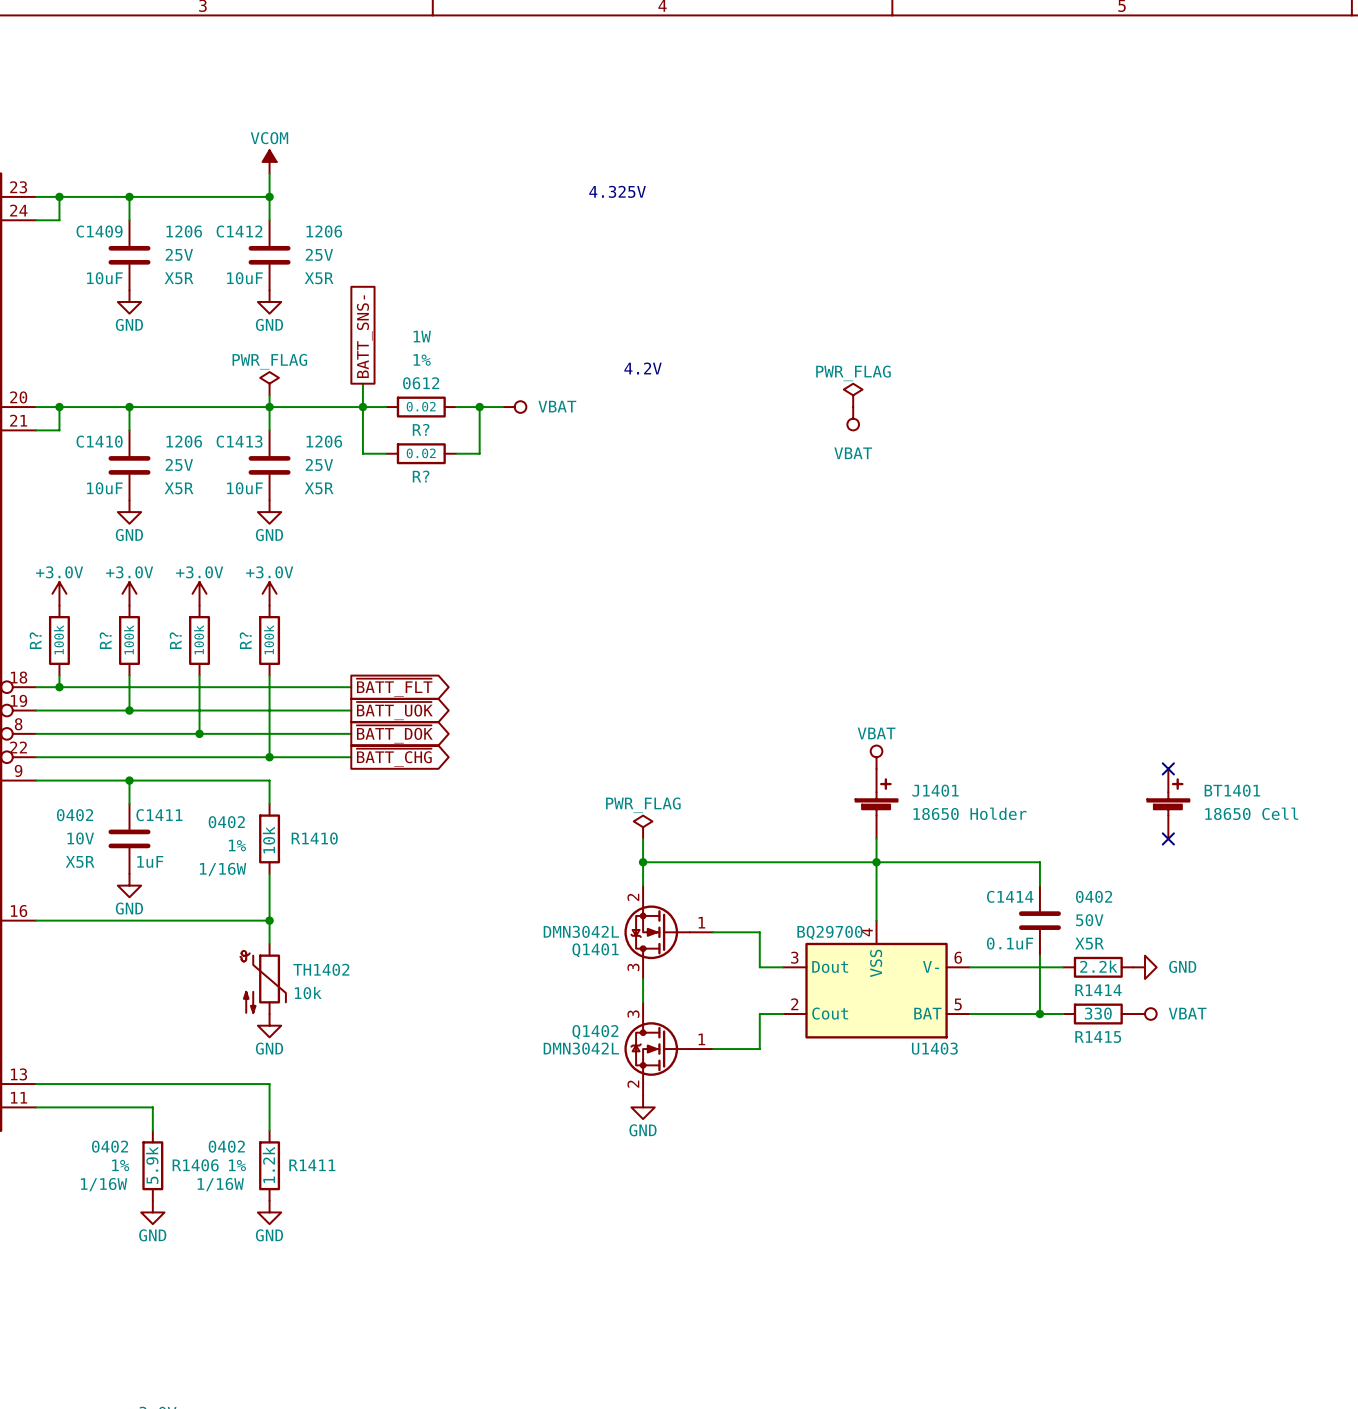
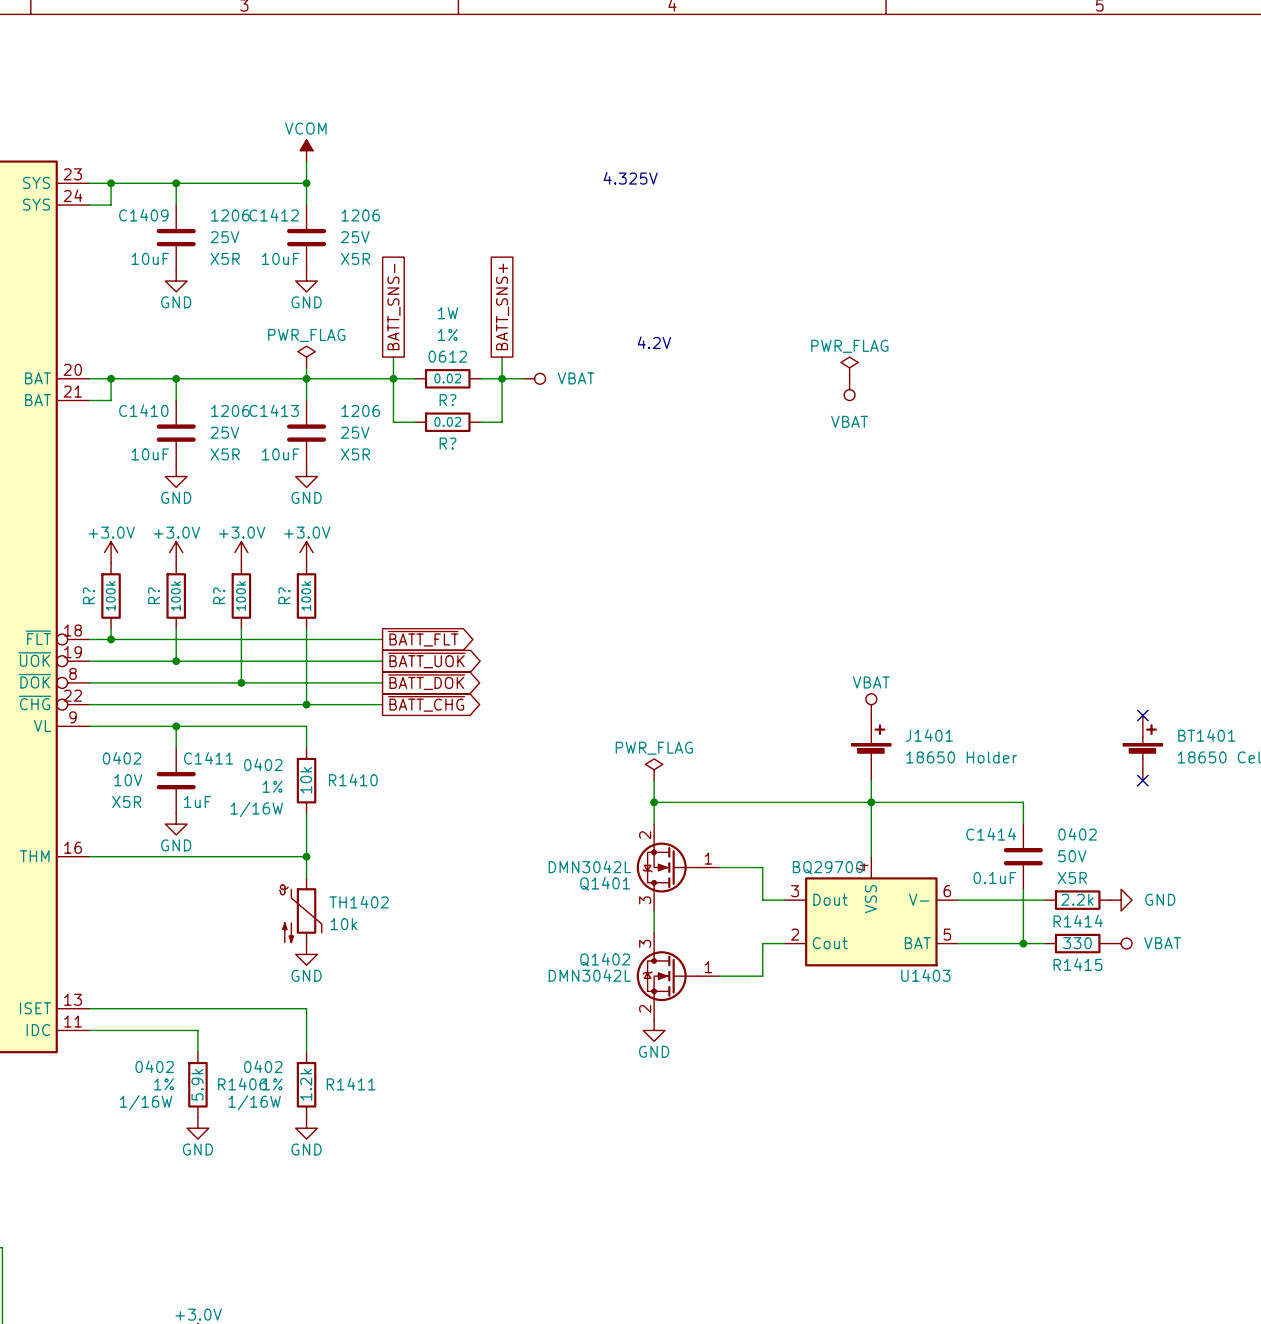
global label: none -> BATT_SNS+ (502, 306)
wire: none -> (502, 357) (502, 378)

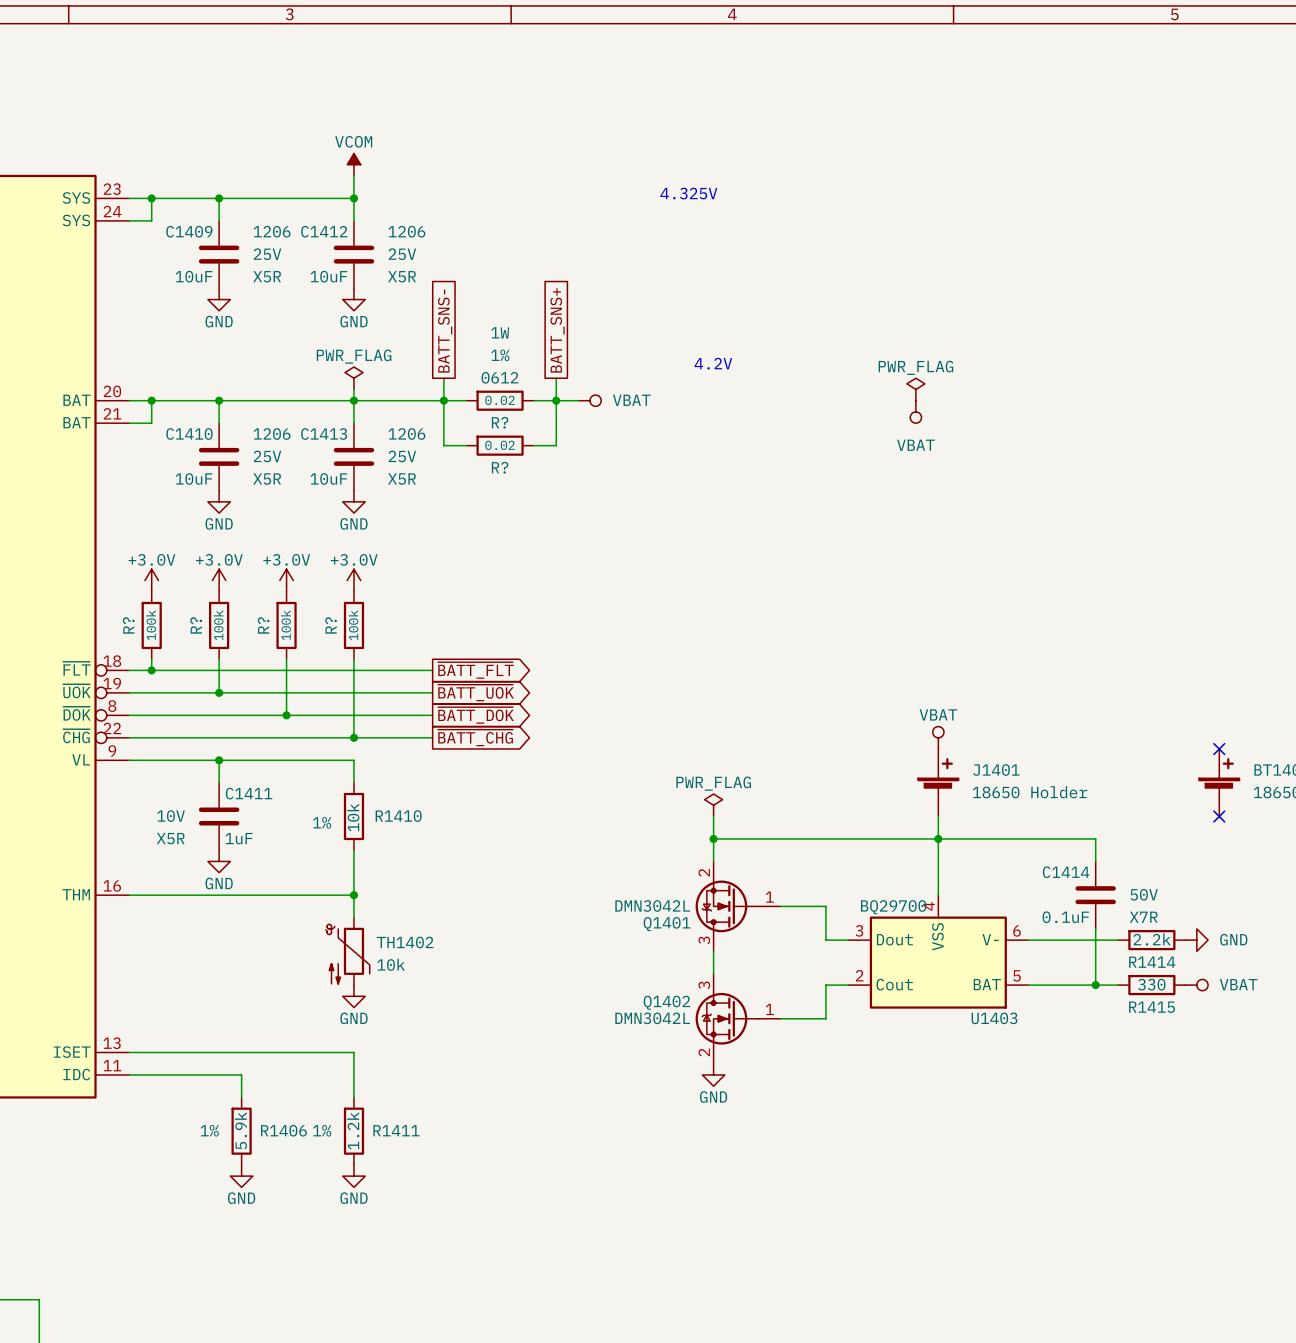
C1411 text: 0402 (122, 758) -> none
R1410 text: 0402 (263, 764) -> none
R1410 text: 1/16W (256, 809) -> none
C1414 text: 0402 (1077, 834) -> none
C1414 text: X5R (1072, 878) -> X7R (1143, 917)
R1406 text: 0402 (154, 1066) -> none
R1411 text: 0402 (263, 1066) -> none
R1406 text: 1/16W (146, 1102) -> none
R1411 text: 1/16W (254, 1102) -> none

